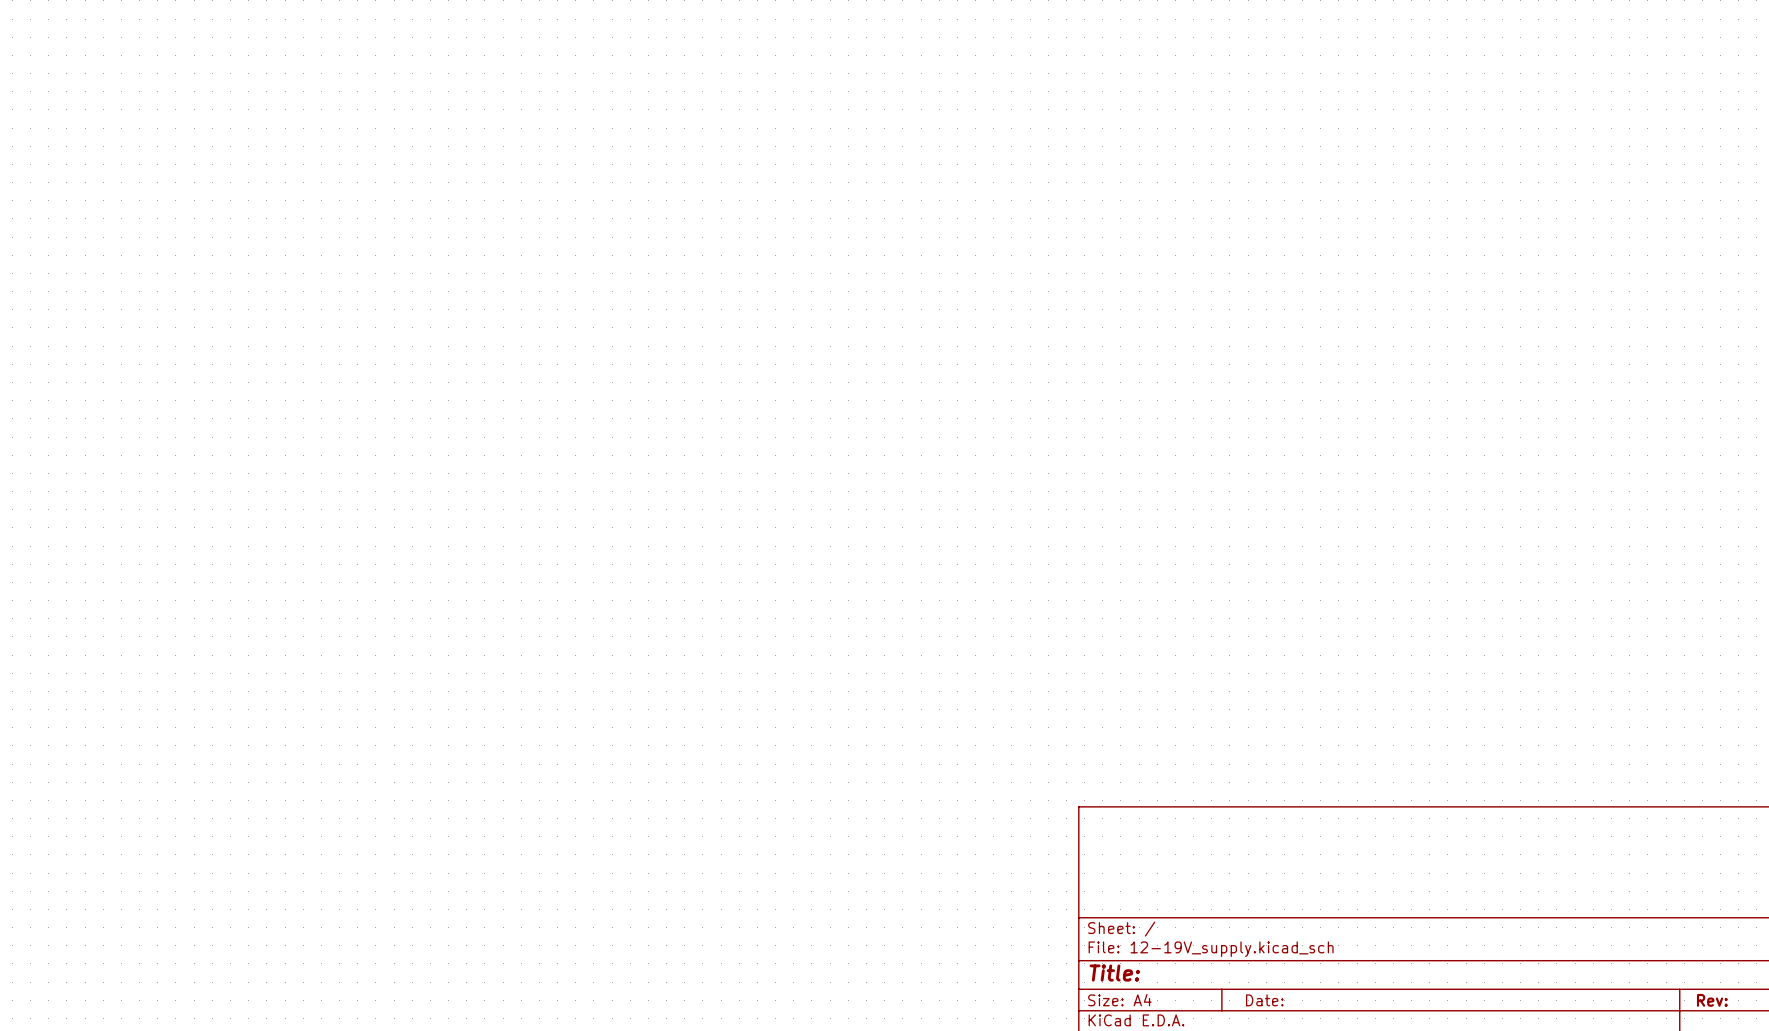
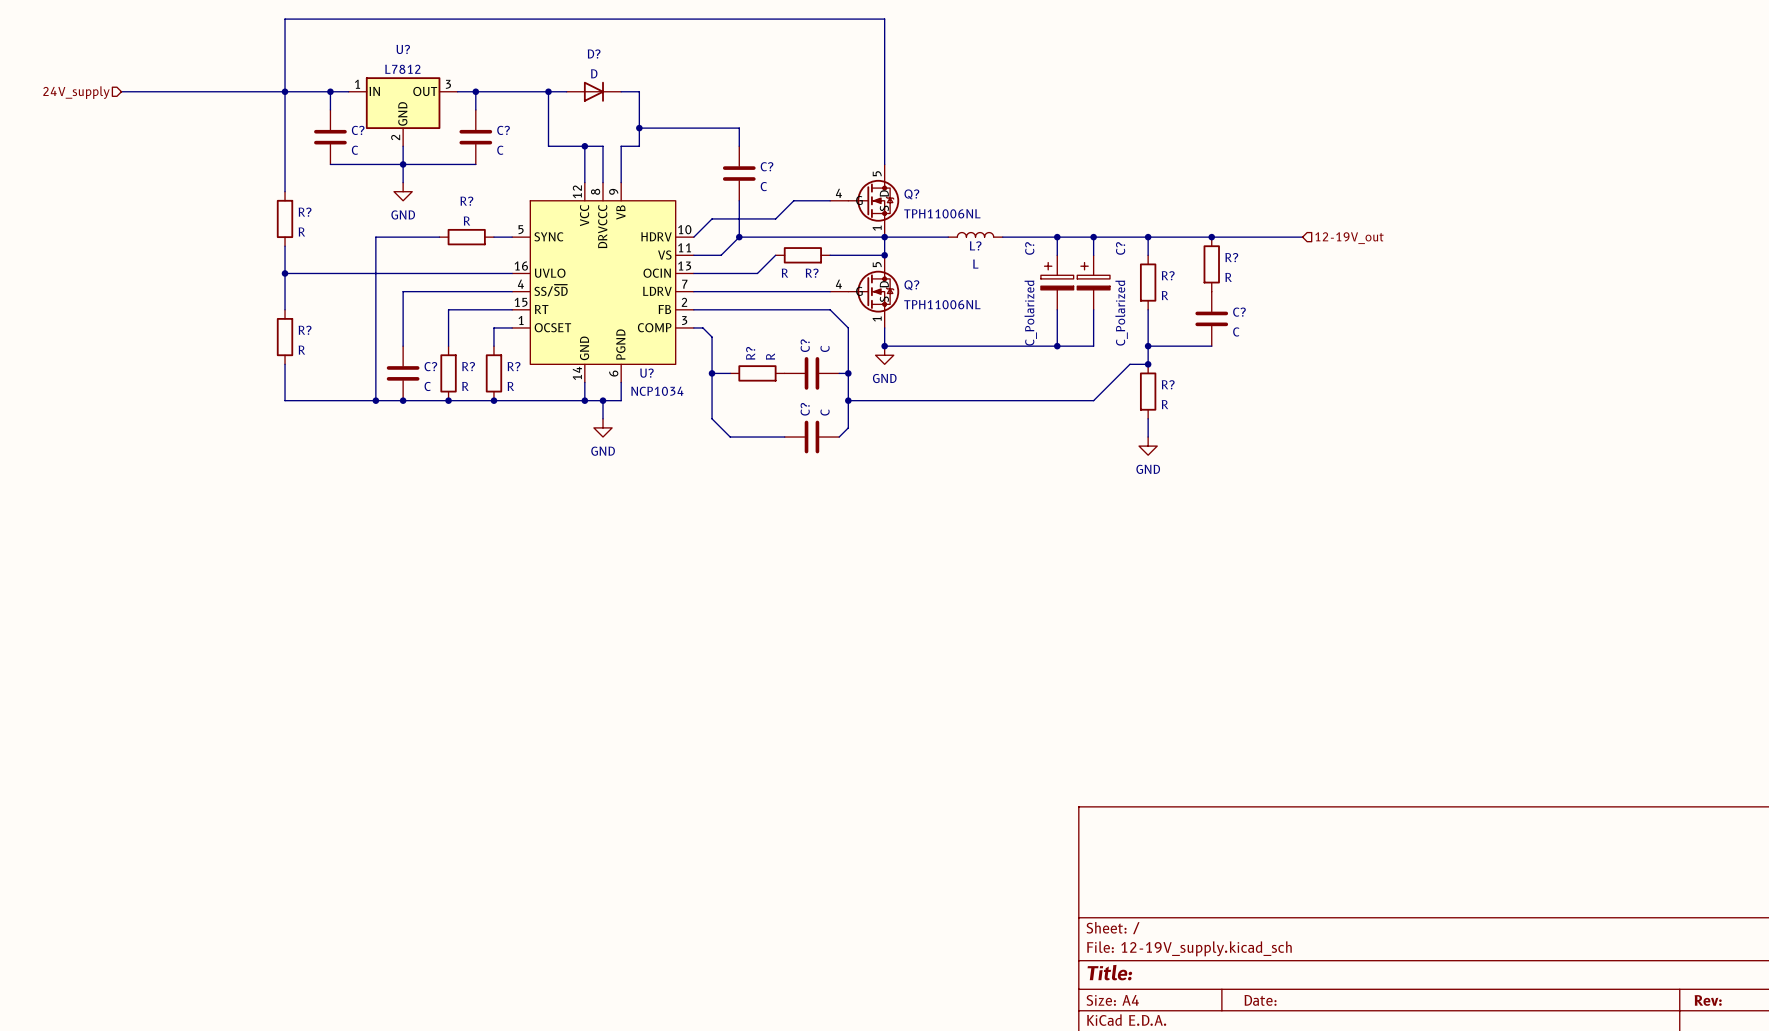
wire: none -> (121, 91) (348, 91)
junction: none -> (285, 91)
wire: none -> (330, 91) (330, 109)
junction: none -> (330, 91)
wire: none -> (457, 91) (566, 91)
wire: none -> (475, 91) (475, 109)
junction: none -> (475, 91)
wire: none -> (548, 91) (548, 146) (603, 146) (603, 182)
junction: none -> (548, 91)
D?: none -> D (593, 91)
wire: none -> (621, 91) (639, 91) (639, 146) (621, 146) (621, 182)
hierarchical label: none -> 24V_supply (76, 92)
U?: none -> L7812 (403, 111)
wire: none -> (639, 128) (739, 128) (739, 146)
junction: none -> (639, 128)
C?: none -> C (330, 137)
C?: none -> C (475, 137)
wire: none -> (403, 146) (403, 182)
wire: none -> (584, 146) (584, 182)
junction: none -> (584, 146)
wire: none -> (330, 164) (475, 164)
junction: none -> (403, 164)
wire: none -> (884, 164) (884, 19) (285, 19) (285, 191)
C?: none -> C (739, 173)
power symbol: none -> GND (403, 191)
wire: none -> (739, 200) (739, 237)
wire: none -> (830, 200) (793, 200) (775, 218) (712, 218) (693, 237)
Q?: none -> TPH11006NL (864, 200)
R?: none -> R (285, 218)
L?: none -> L (975, 234)
wire: none -> (439, 237) (375, 237) (375, 400)
R?: none -> R (466, 237)
wire: none -> (493, 237) (512, 237)
wire: none -> (739, 237) (721, 255) (693, 255)
wire: none -> (739, 237) (948, 237)
junction: none -> (739, 237)
wire: none -> (884, 237) (884, 255) (830, 255)
junction: none -> (884, 237)
wire: none -> (1002, 237) (1302, 237)
wire: none -> (1057, 237) (1057, 255)
junction: none -> (1057, 237)
wire: none -> (1093, 237) (1093, 255)
junction: none -> (1093, 237)
wire: none -> (1148, 237) (1148, 255)
junction: none -> (1148, 237)
junction: none -> (1211, 237)
hierarchical label: none -> 12-19V_out (1349, 238)
wire: none -> (285, 246) (285, 309)
wire: none -> (775, 255) (757, 273) (693, 273)
R?: none -> R (802, 255)
junction: none -> (884, 255)
R?: none -> R (1211, 264)
wire: none -> (285, 273) (512, 273)
junction: none -> (285, 273)
U?: none -> NCP1034 (603, 282)
C?: none -> C_Polarized (1057, 282)
C?: none -> C_Polarized (1093, 282)
R?: none -> R (1148, 282)
wire: none -> (512, 291) (403, 291) (403, 346)
wire: none -> (693, 291) (830, 291)
Q?: none -> TPH11006NL (864, 291)
wire: none -> (512, 309) (448, 309) (448, 346)
wire: none -> (693, 309) (830, 309) (848, 327) (848, 427) (839, 437)
wire: none -> (1057, 309) (1057, 346)
wire: none -> (1093, 309) (1093, 346) (884, 346) (884, 327)
wire: none -> (1148, 309) (1148, 364) (1129, 364) (1093, 400) (848, 400)
C?: none -> C (1211, 318)
wire: none -> (512, 327) (493, 327) (493, 346)
wire: none -> (693, 327) (702, 327) (712, 337) (712, 418) (730, 437) (784, 437)
R?: none -> R (285, 337)
junction: none -> (884, 346)
junction: none -> (1057, 346)
wire: none -> (1148, 346) (1211, 346)
junction: none -> (1148, 346)
power symbol: none -> GND (884, 355)
wire: none -> (285, 364) (285, 400) (621, 400) (621, 382)
junction: none -> (1148, 364)
C?: none -> C (403, 373)
R?: none -> R (448, 373)
R?: none -> R (493, 373)
wire: none -> (712, 373) (730, 373)
junction: none -> (712, 373)
R?: none -> R (757, 373)
C?: none -> C (811, 373)
wire: none -> (839, 373) (848, 373)
junction: none -> (848, 373)
wire: none -> (584, 382) (584, 400)
R?: none -> R (1148, 391)
junction: none -> (375, 400)
junction: none -> (403, 400)
junction: none -> (448, 400)
junction: none -> (493, 400)
junction: none -> (584, 400)
wire: none -> (603, 400) (603, 418)
junction: none -> (603, 400)
junction: none -> (848, 400)
wire: none -> (1148, 418) (1148, 437)
power symbol: none -> GND (603, 427)
C?: none -> C (811, 437)
power symbol: none -> GND (1148, 446)

